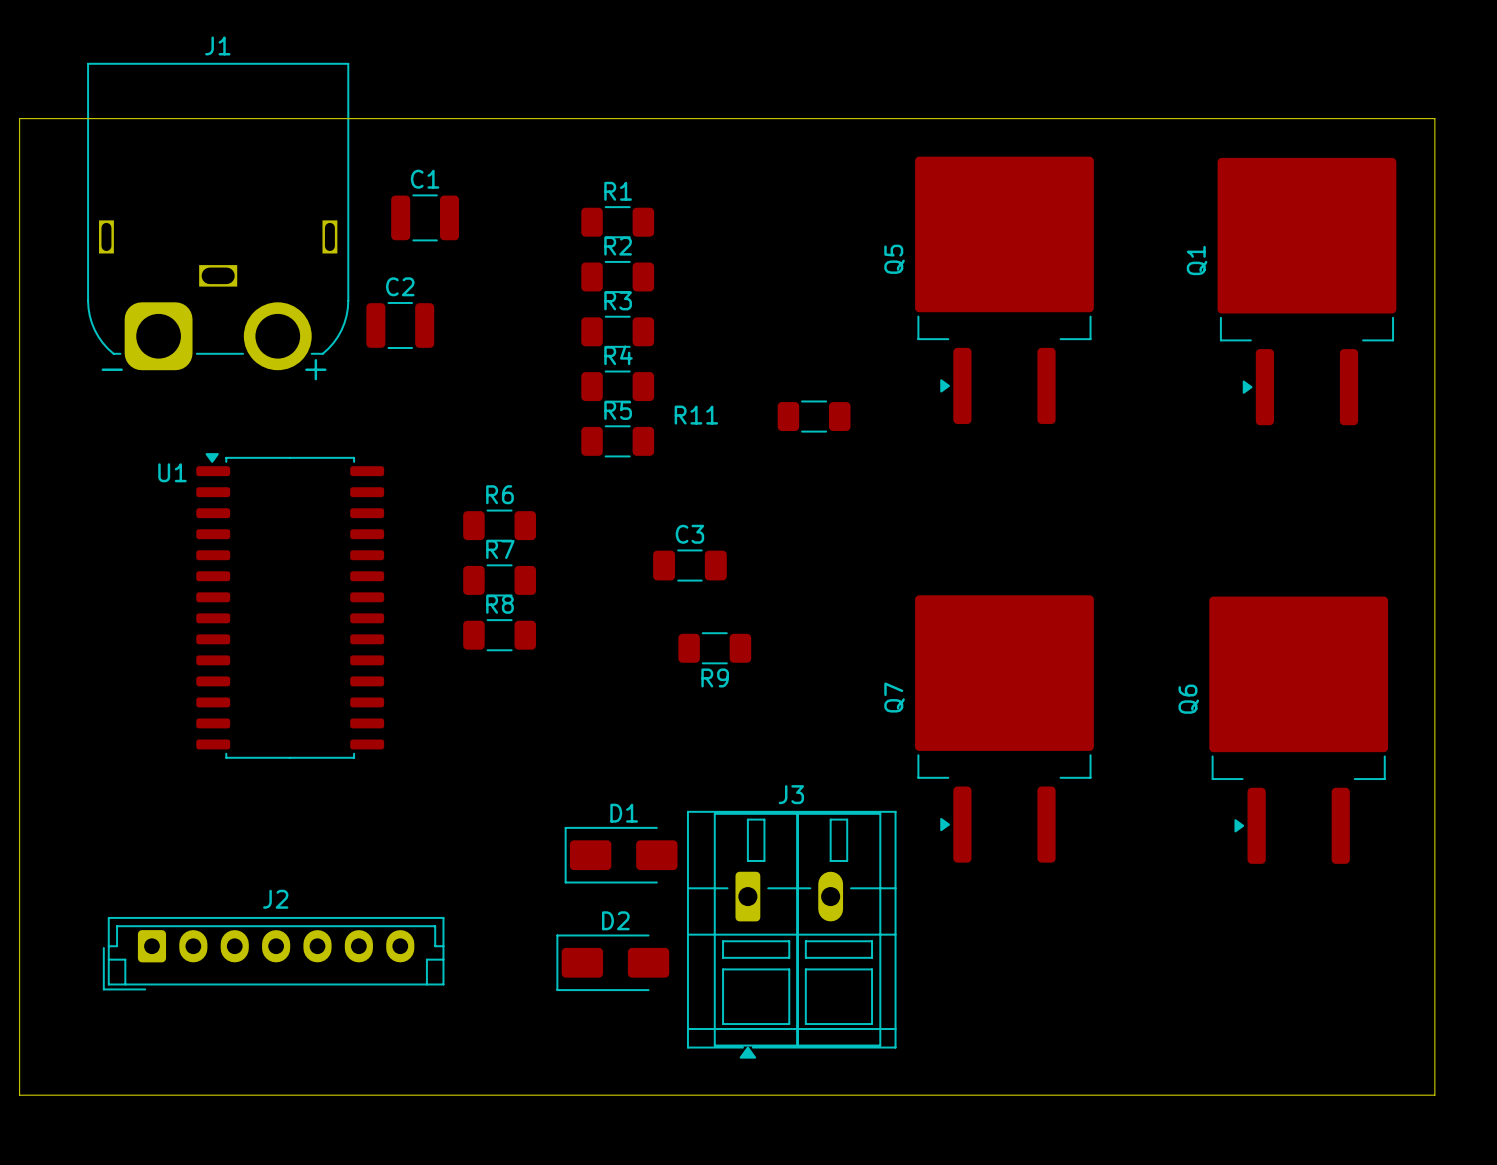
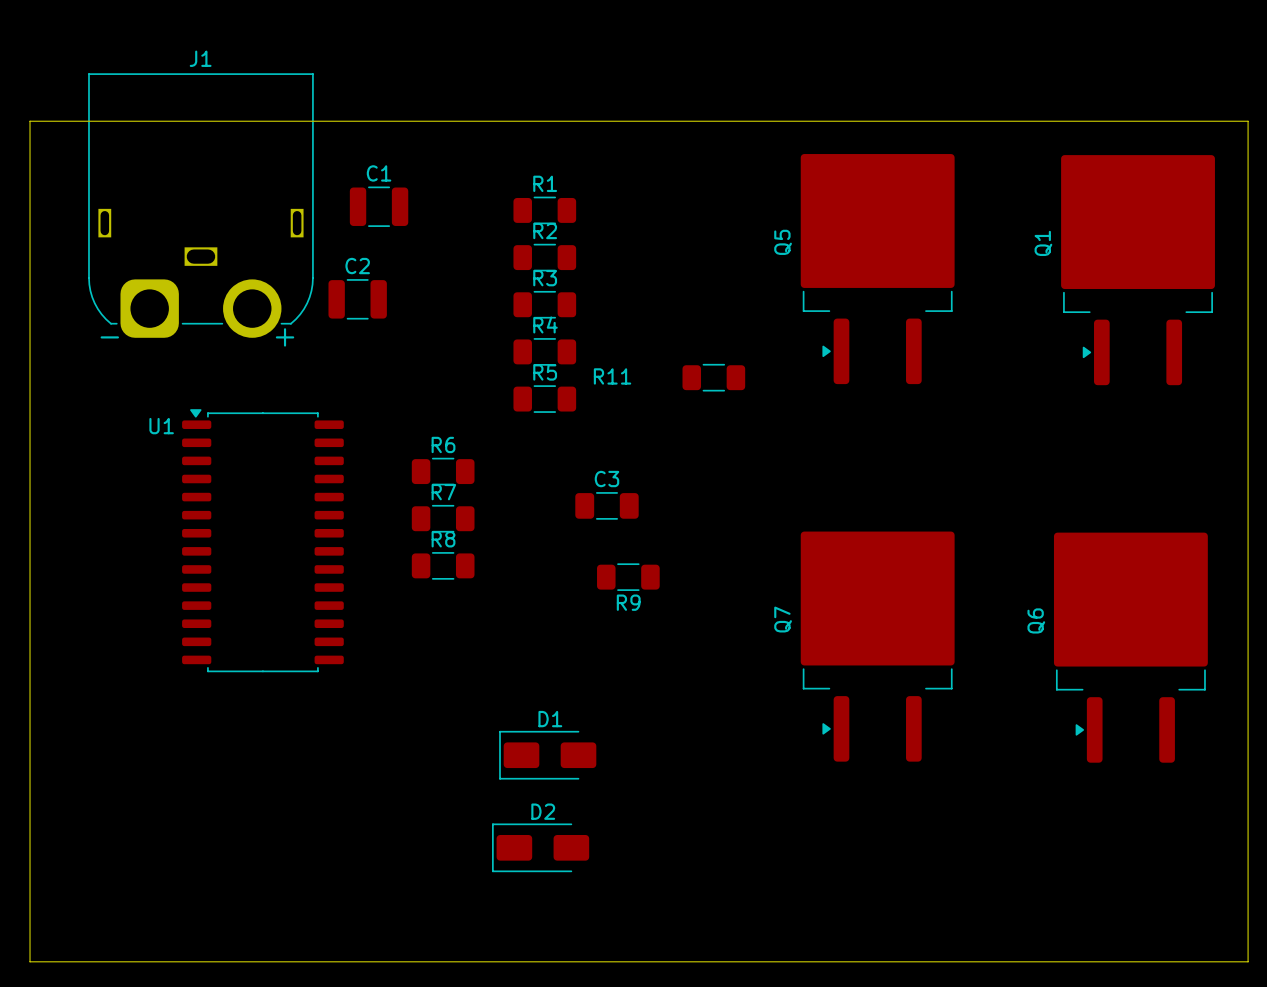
J3: (791, 934) -> none
J2: (273, 953) -> none

